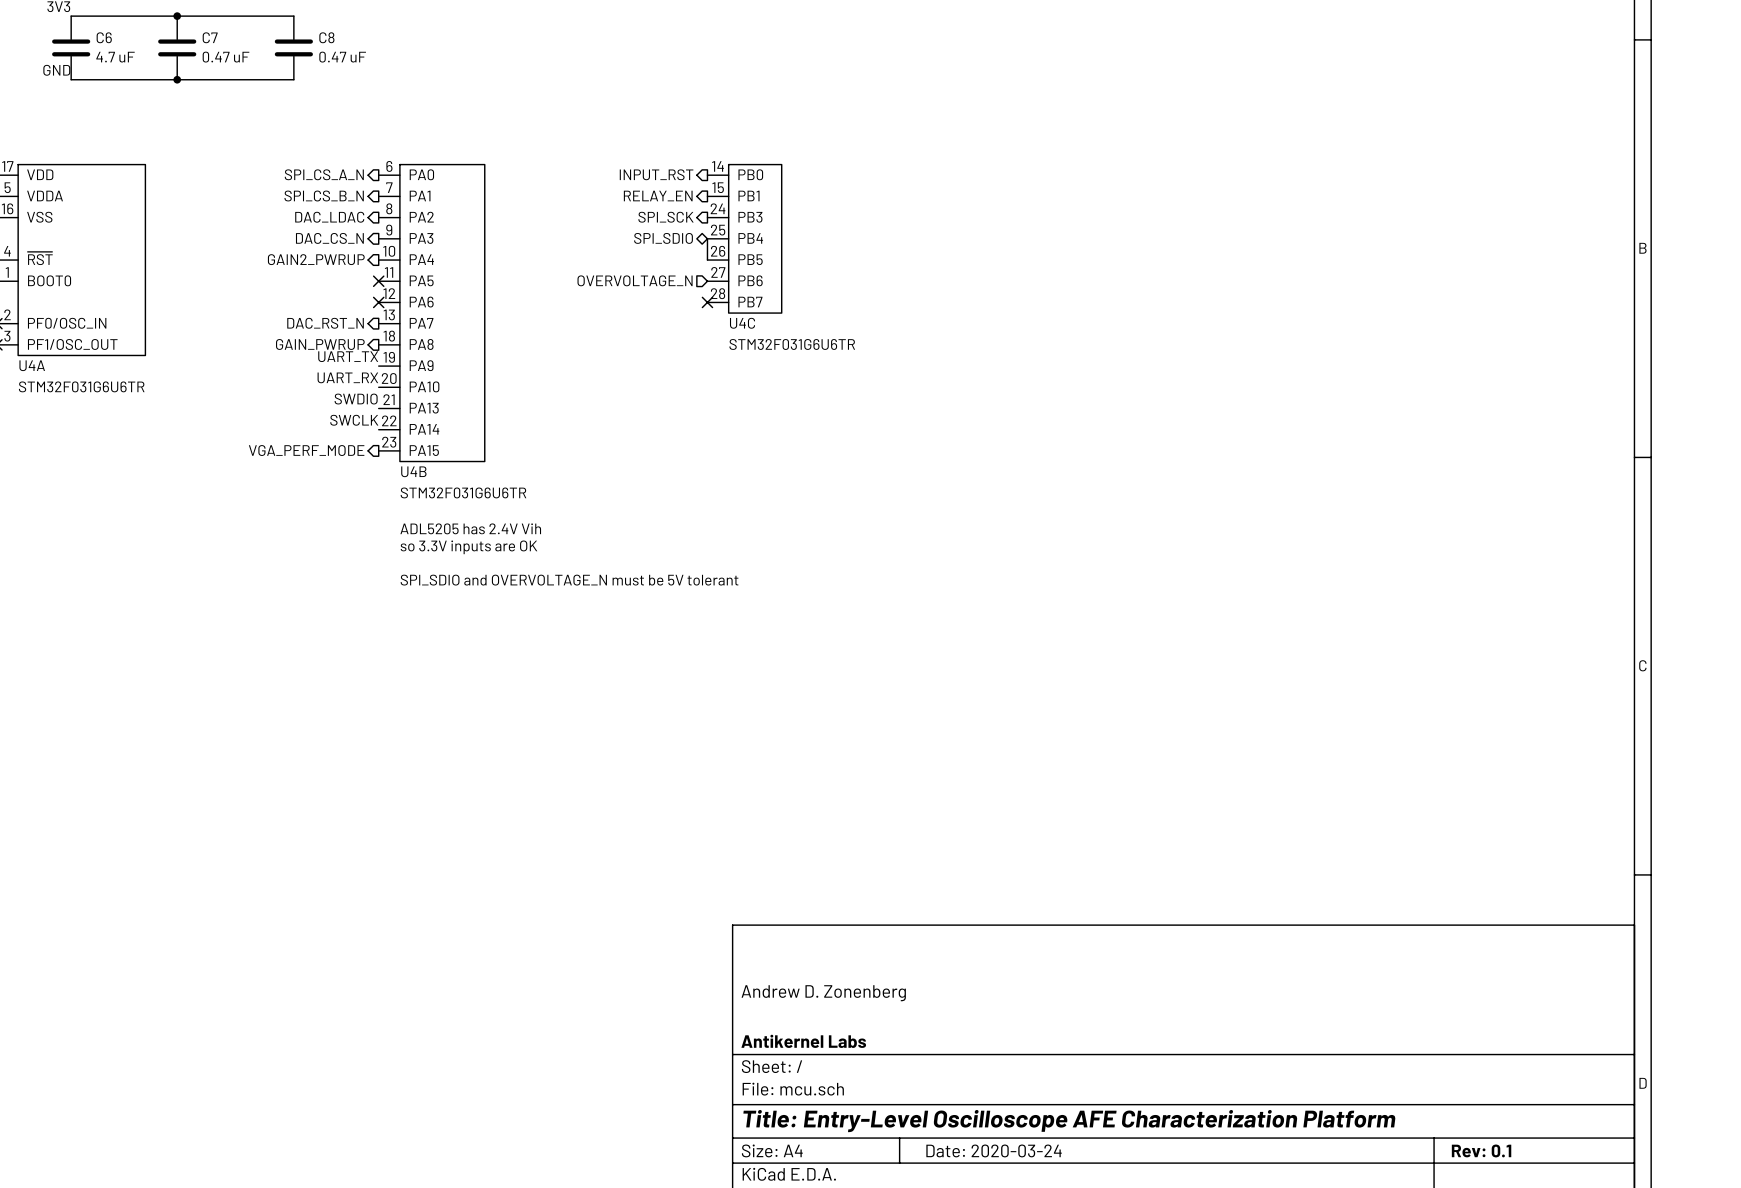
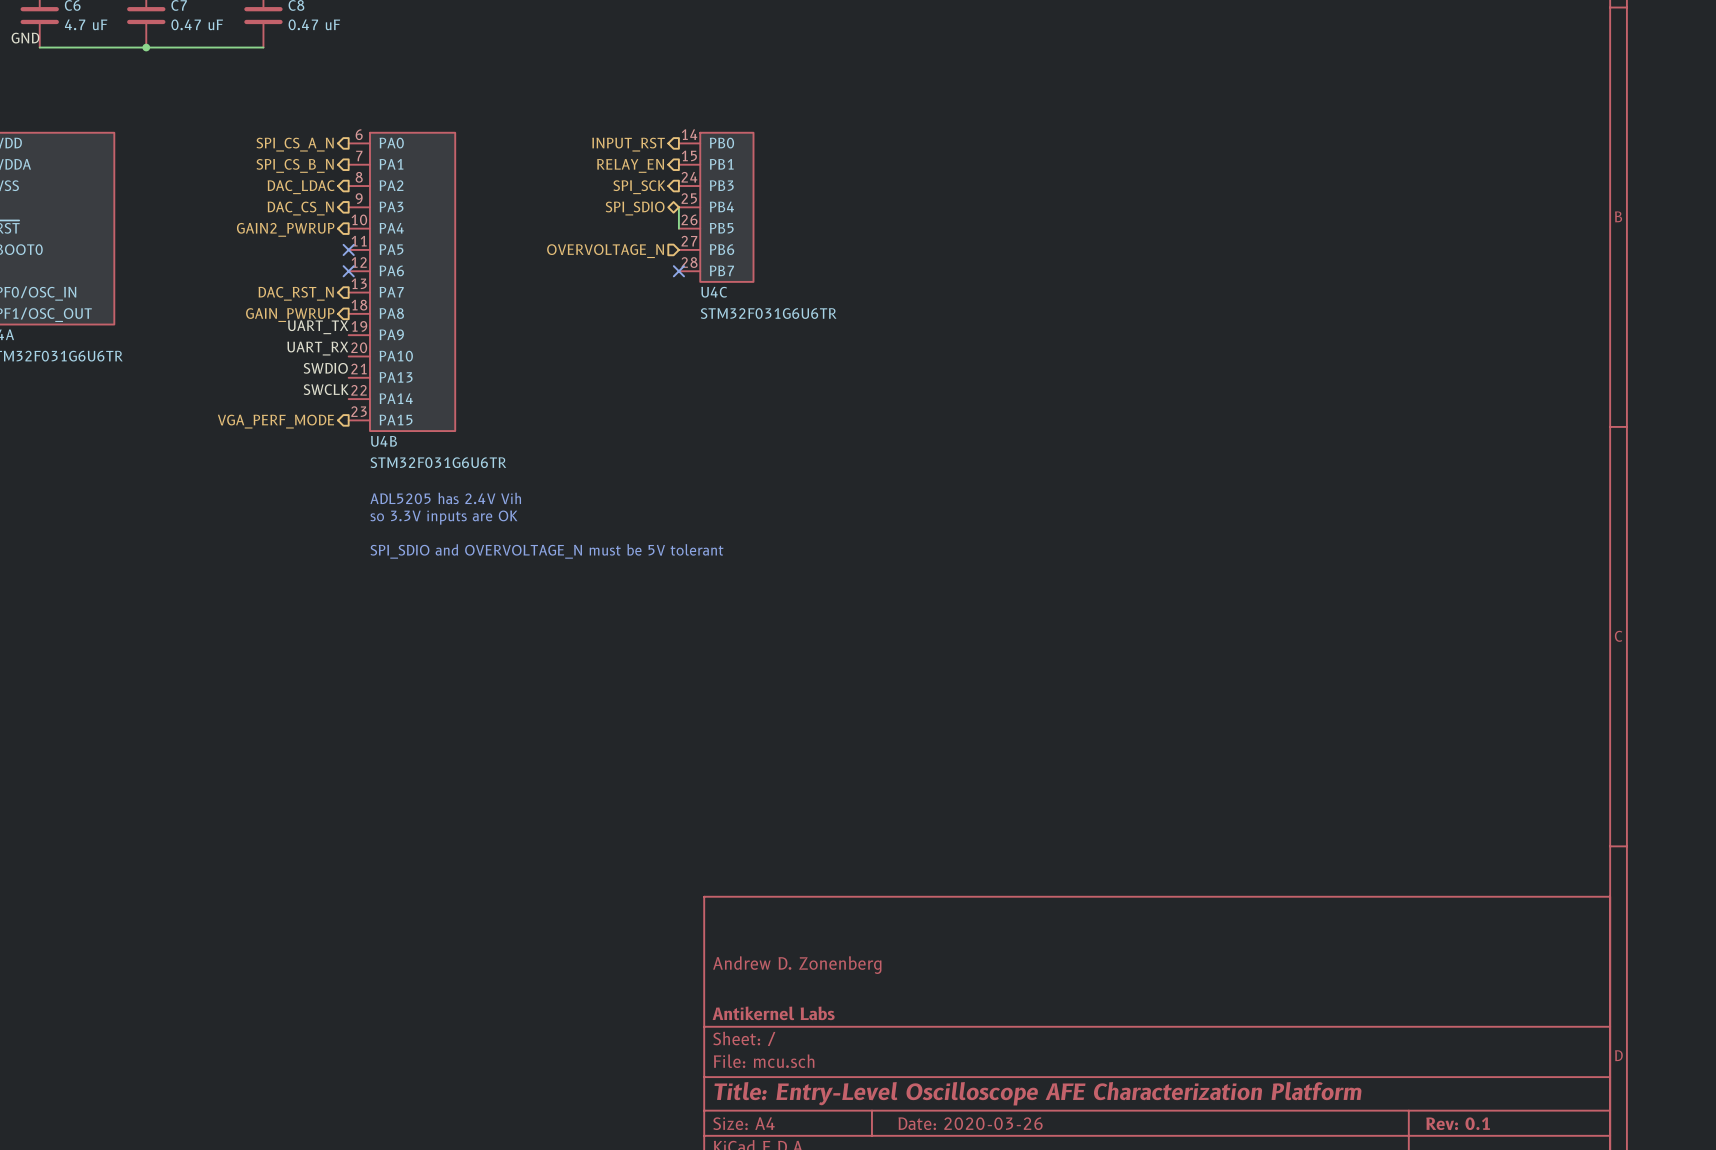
title block: Date: 2020-03-24 (994, 1150) -> Date: 2020-03-26 (970, 1123)

